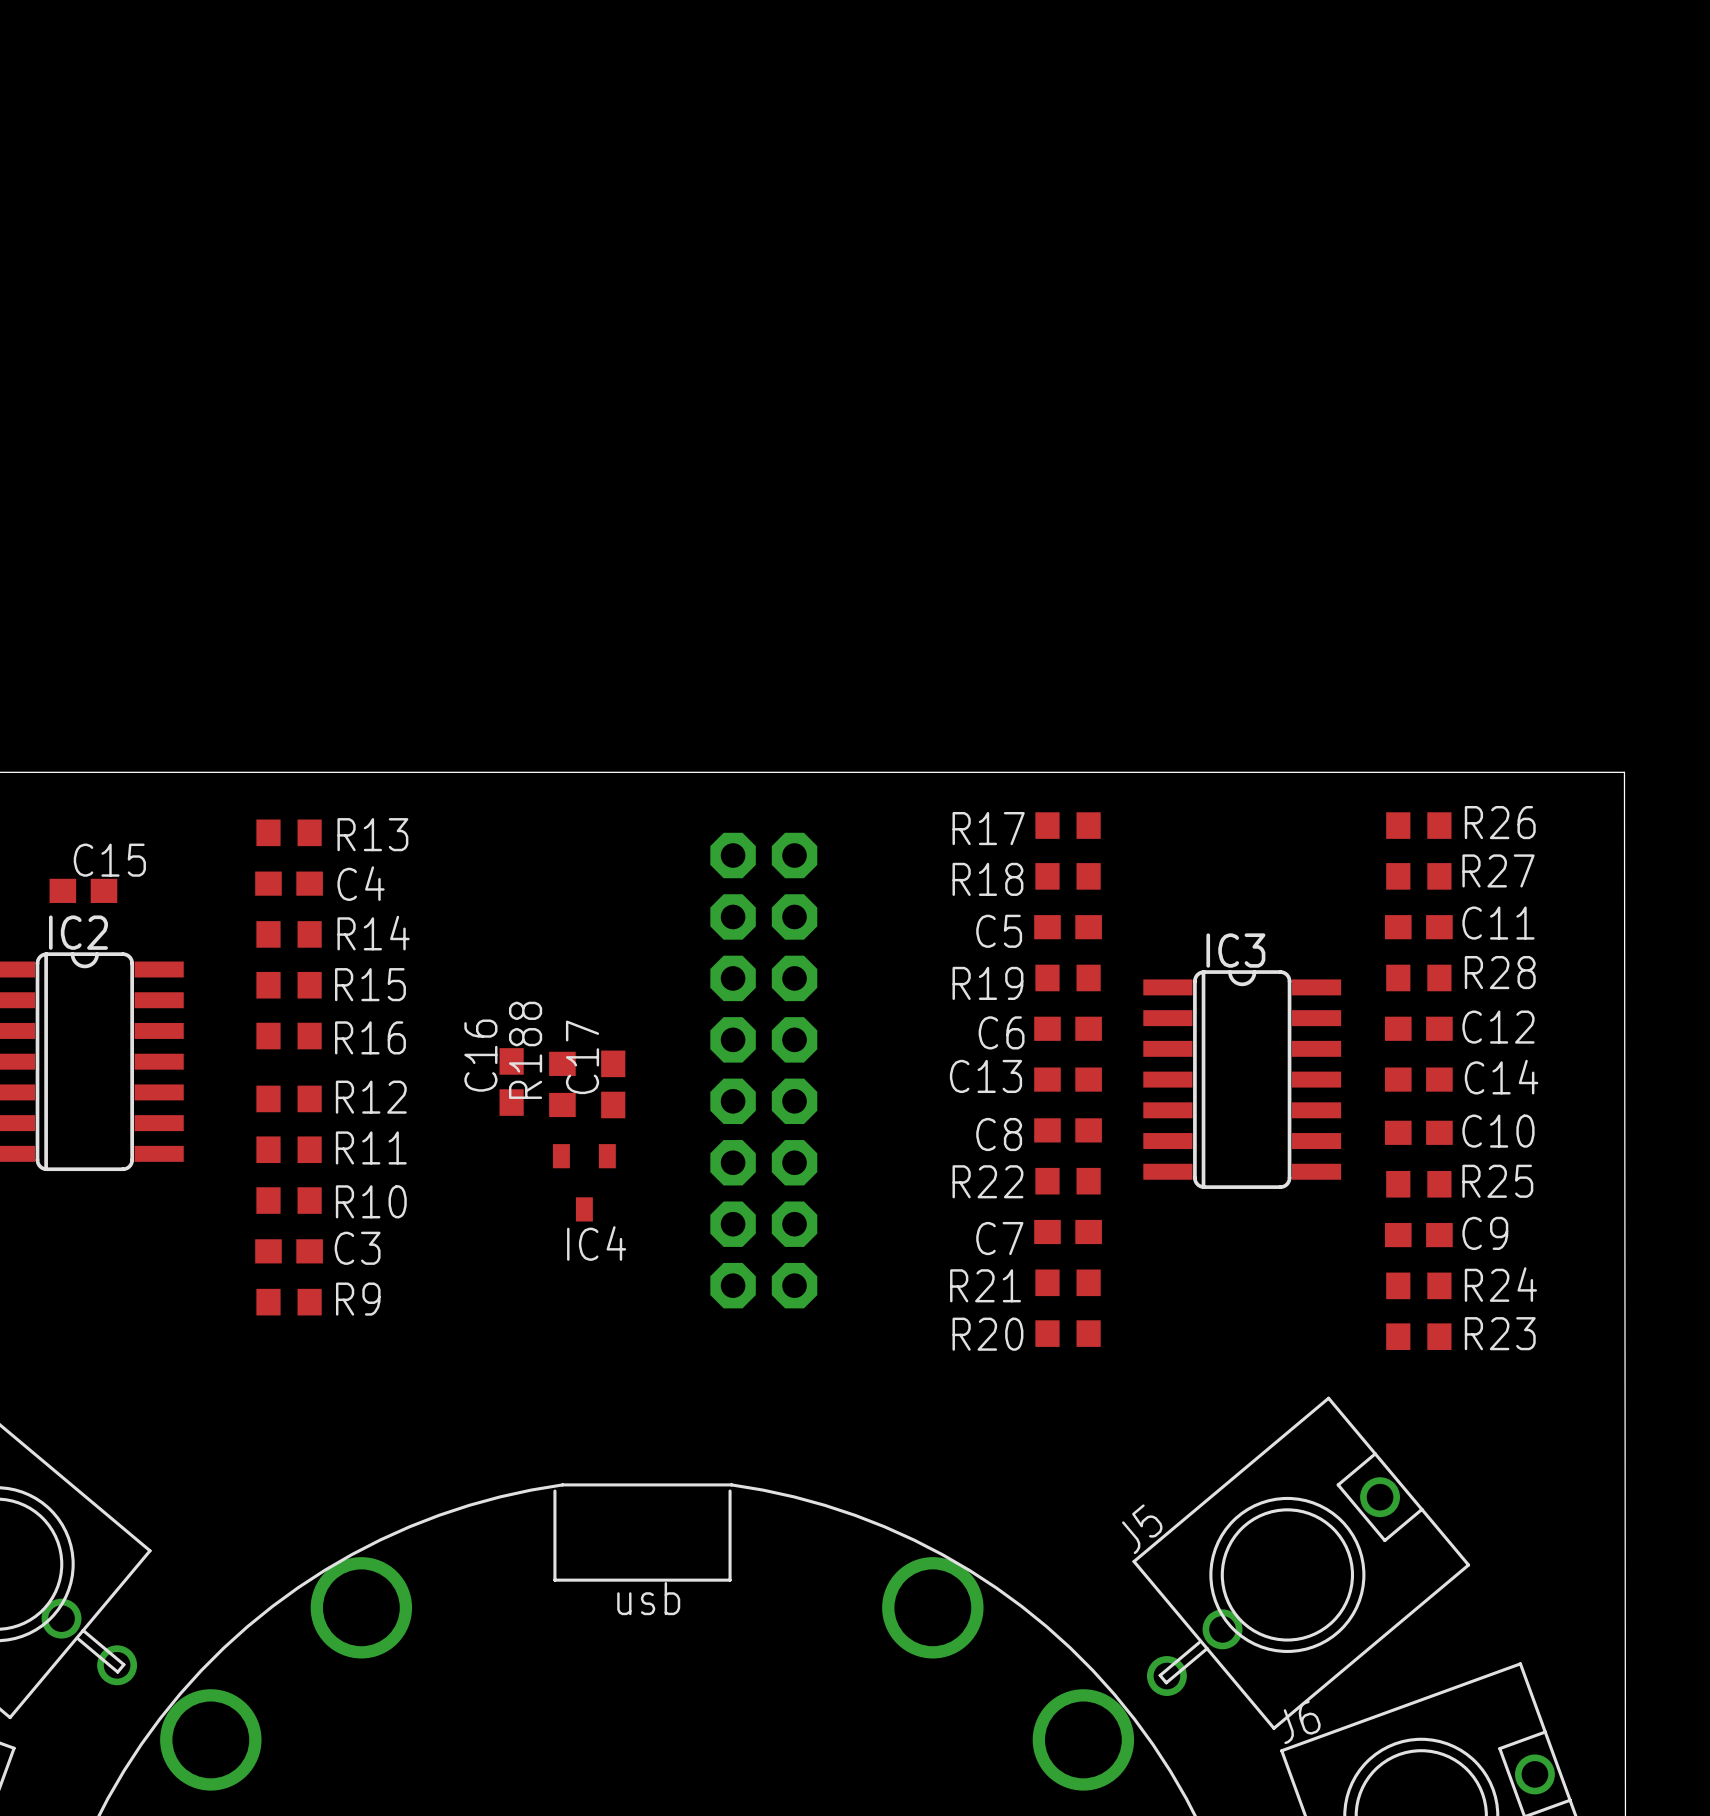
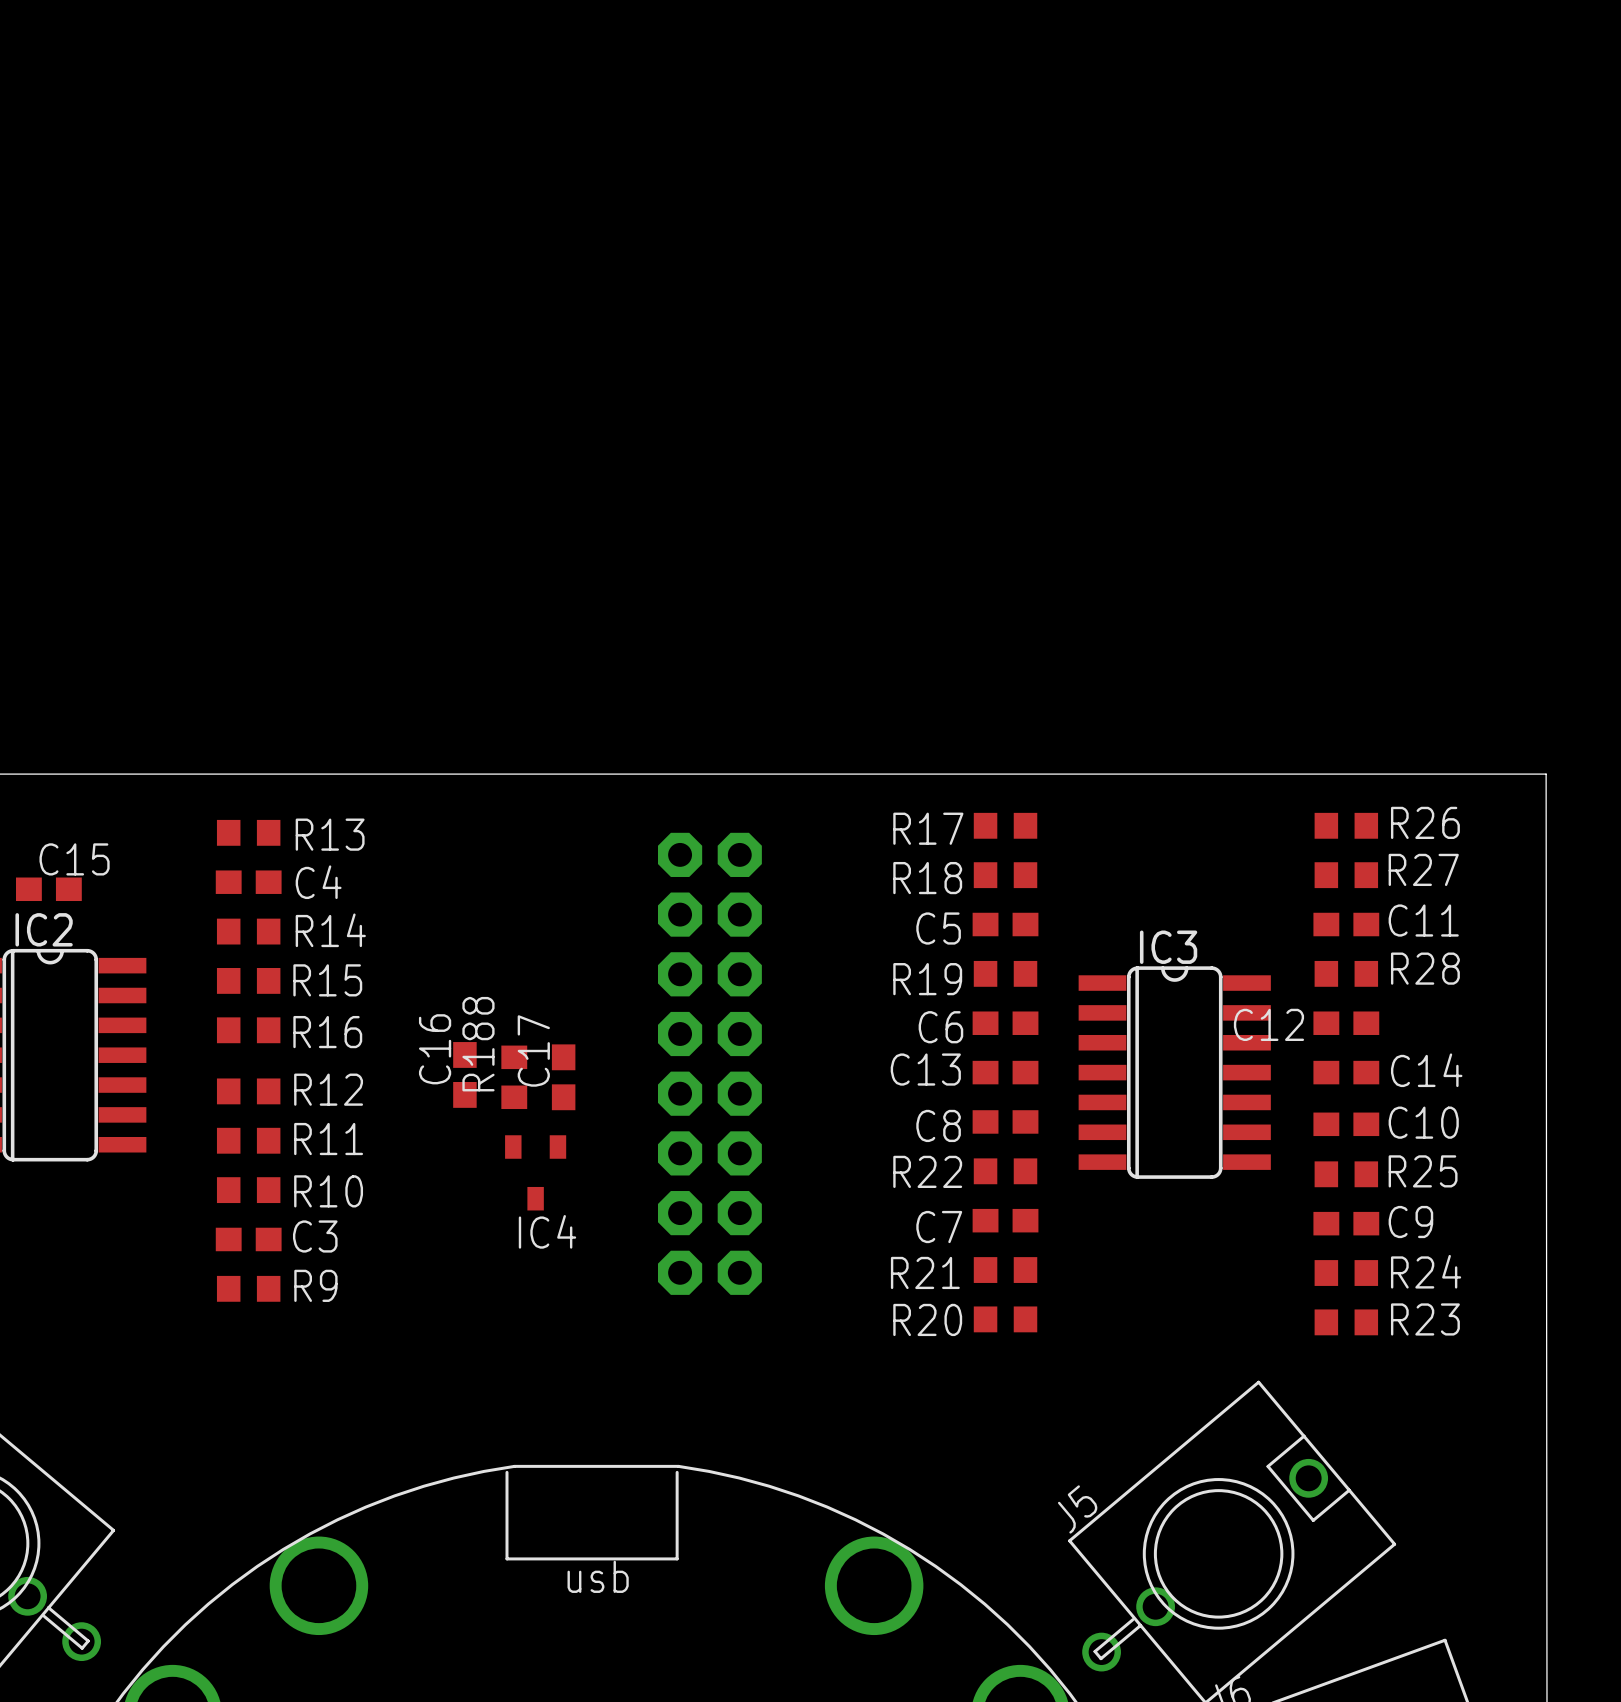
C12 name position: C12 (1498, 1027) -> C12 (1268, 1024)

